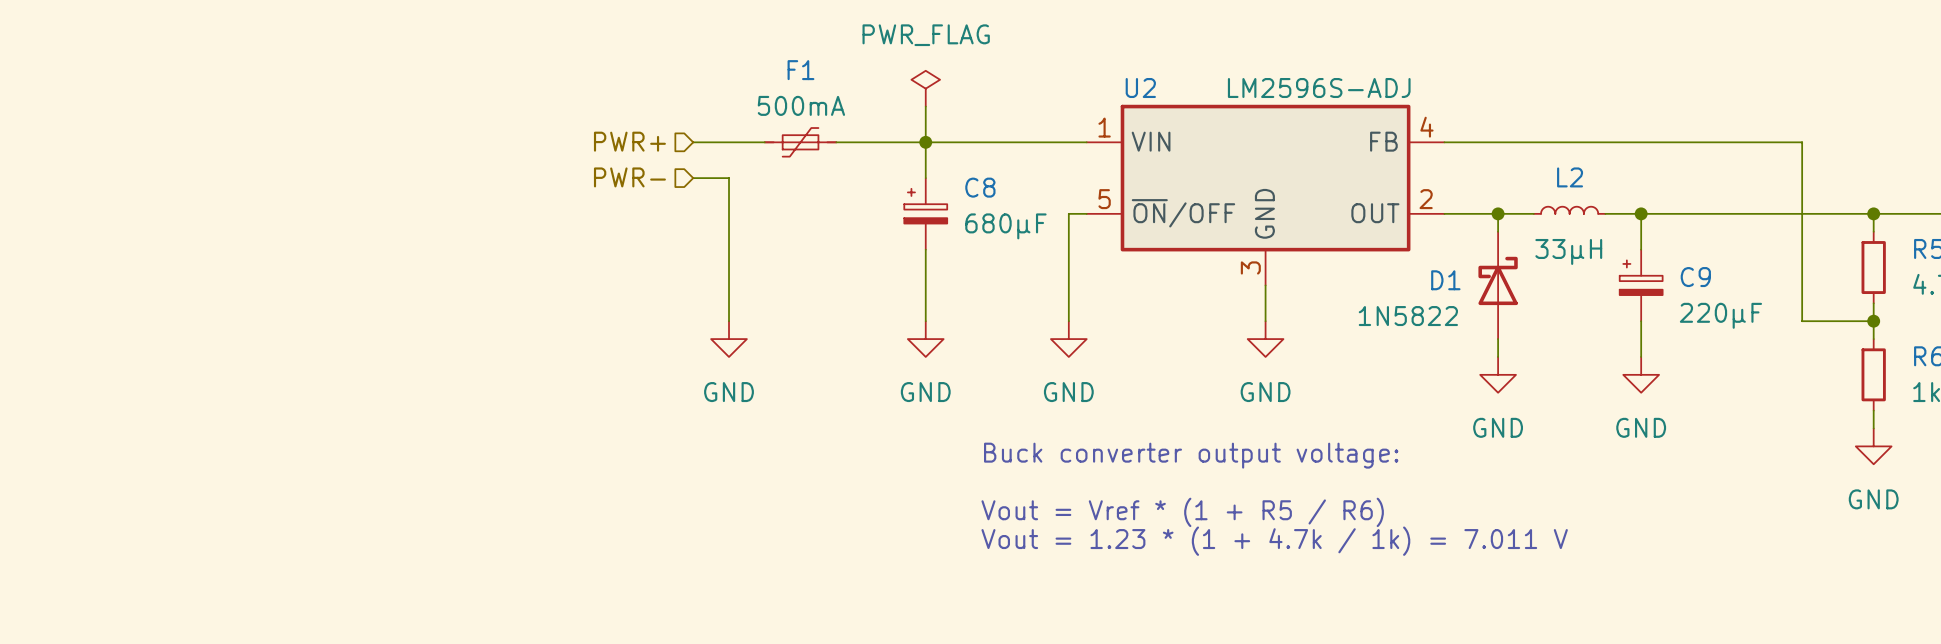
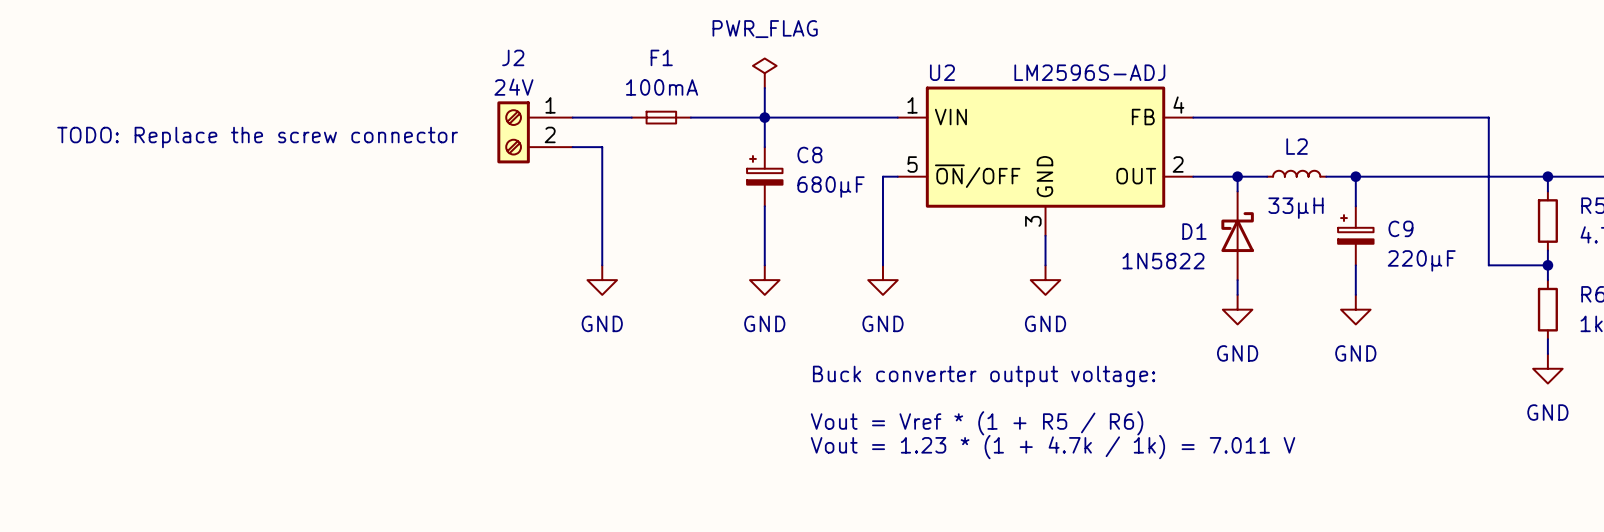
F1 value: 500mA (801, 105) -> 100mA (662, 87)
F1 symbol: [764, 128, 837, 157] -> [631, 111, 691, 124]
hierarchical label: PWR+ (629, 141) -> none
J2: none -> 24V (535, 132)
text: none -> TODO: Replace the screw connector (257, 137)
hierarchical label: PWR- (629, 177) -> none

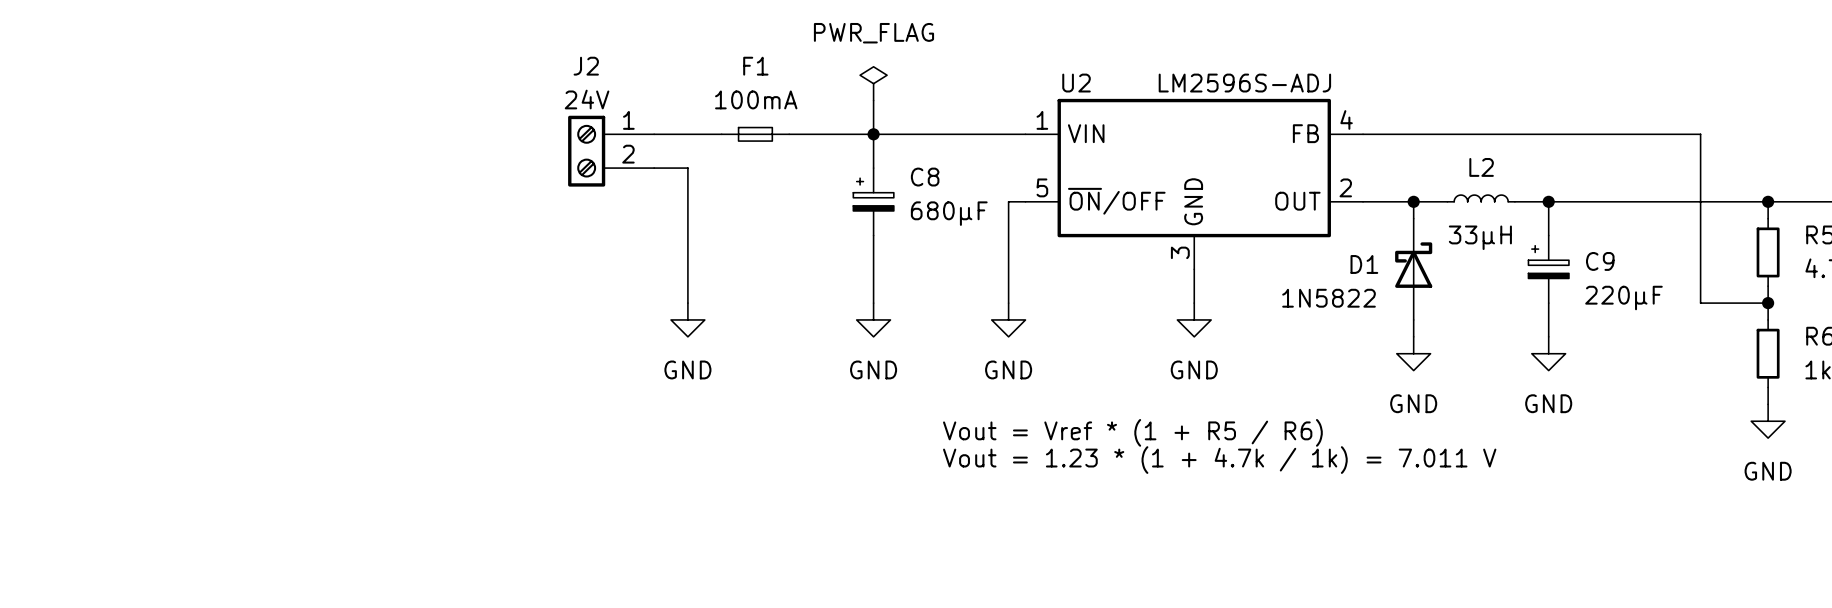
text: TODO: Replace the screw connector (257, 137) -> none
text: Buck converter output voltage: (984, 376) -> none
text position: Vout = Vref * (1 + R5 / R6) (977, 423) -> Vout = Vref * (1 + R5 / R6) (1132, 432)
text position: Vout = 1.23 * (1 + 4.7k / 1k) = 7.011 V (1053, 447) -> Vout = 1.23 * (1 + 4.7k / 1k) = 7.011 V (1219, 460)

